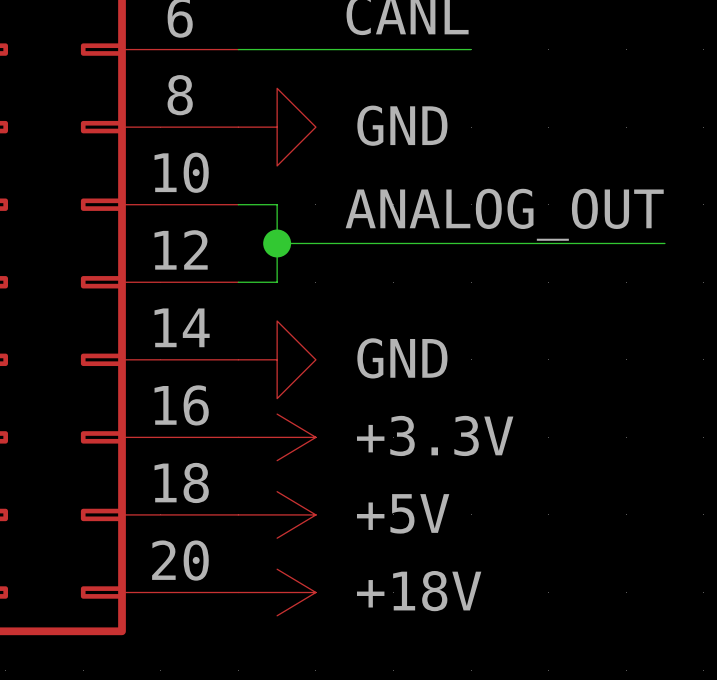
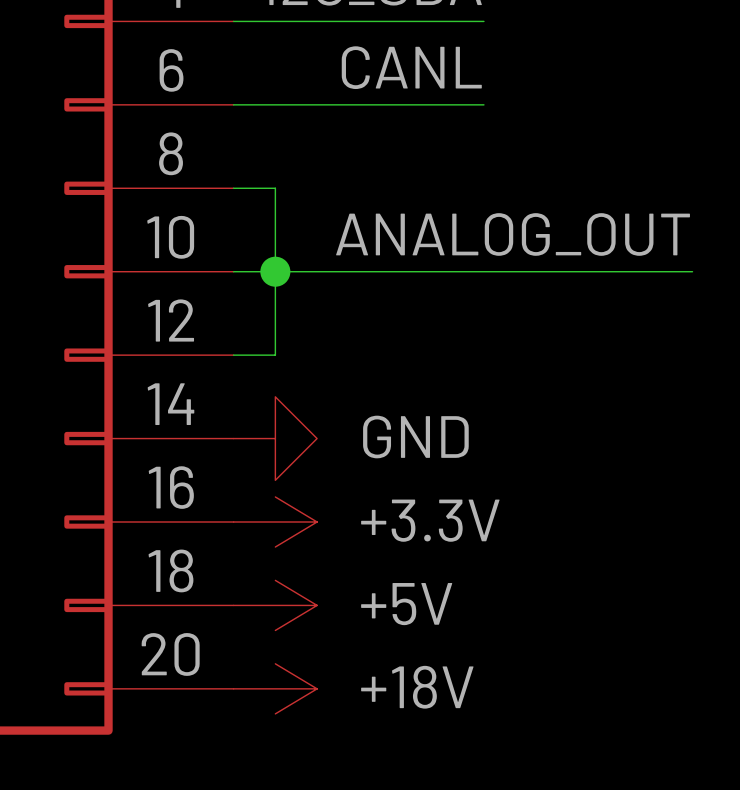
wire: none -> (233, 188) (275, 188) (275, 271) (692, 271)
power symbol: GND (277, 127) -> none
label position: ANALOG_OUT (504, 214) -> ANALOG_OUT (512, 234)
wire: (277, 243) (664, 243) -> none
junction position: (277, 243) -> (275, 271)

